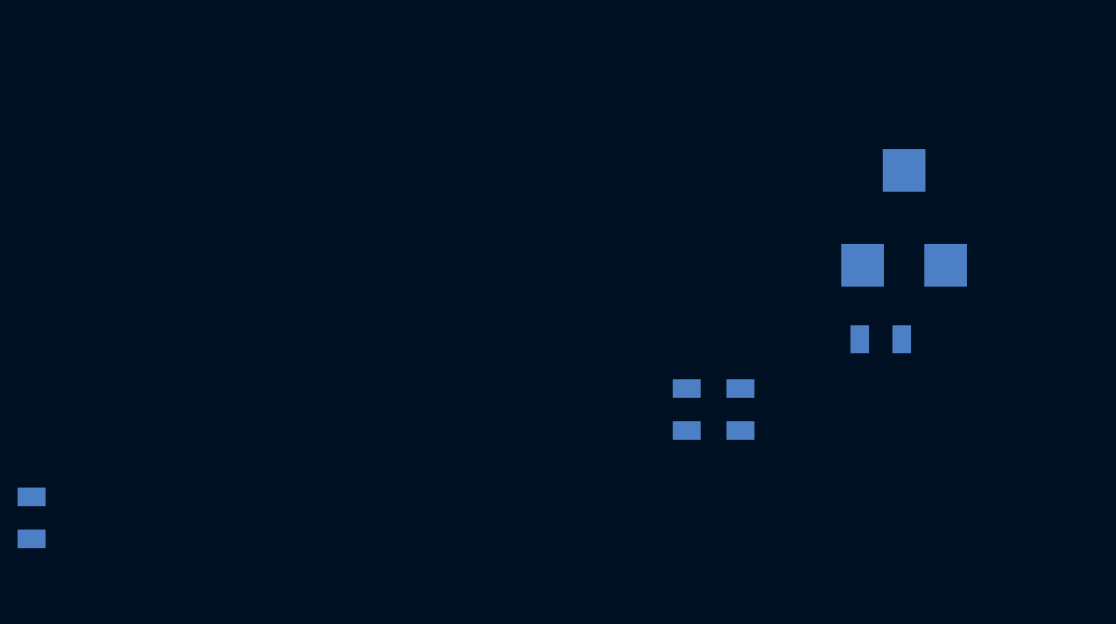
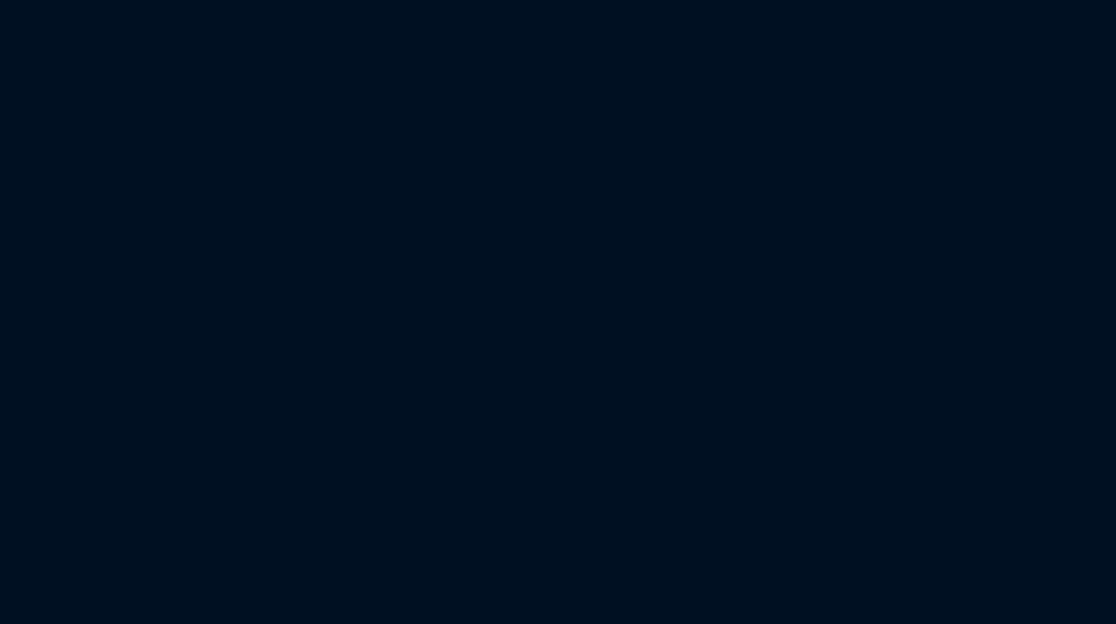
part: (904, 217) -> none
part: (880, 339) -> none
part: (686, 409) -> none
part: (740, 409) -> none
part: (31, 517) -> none

